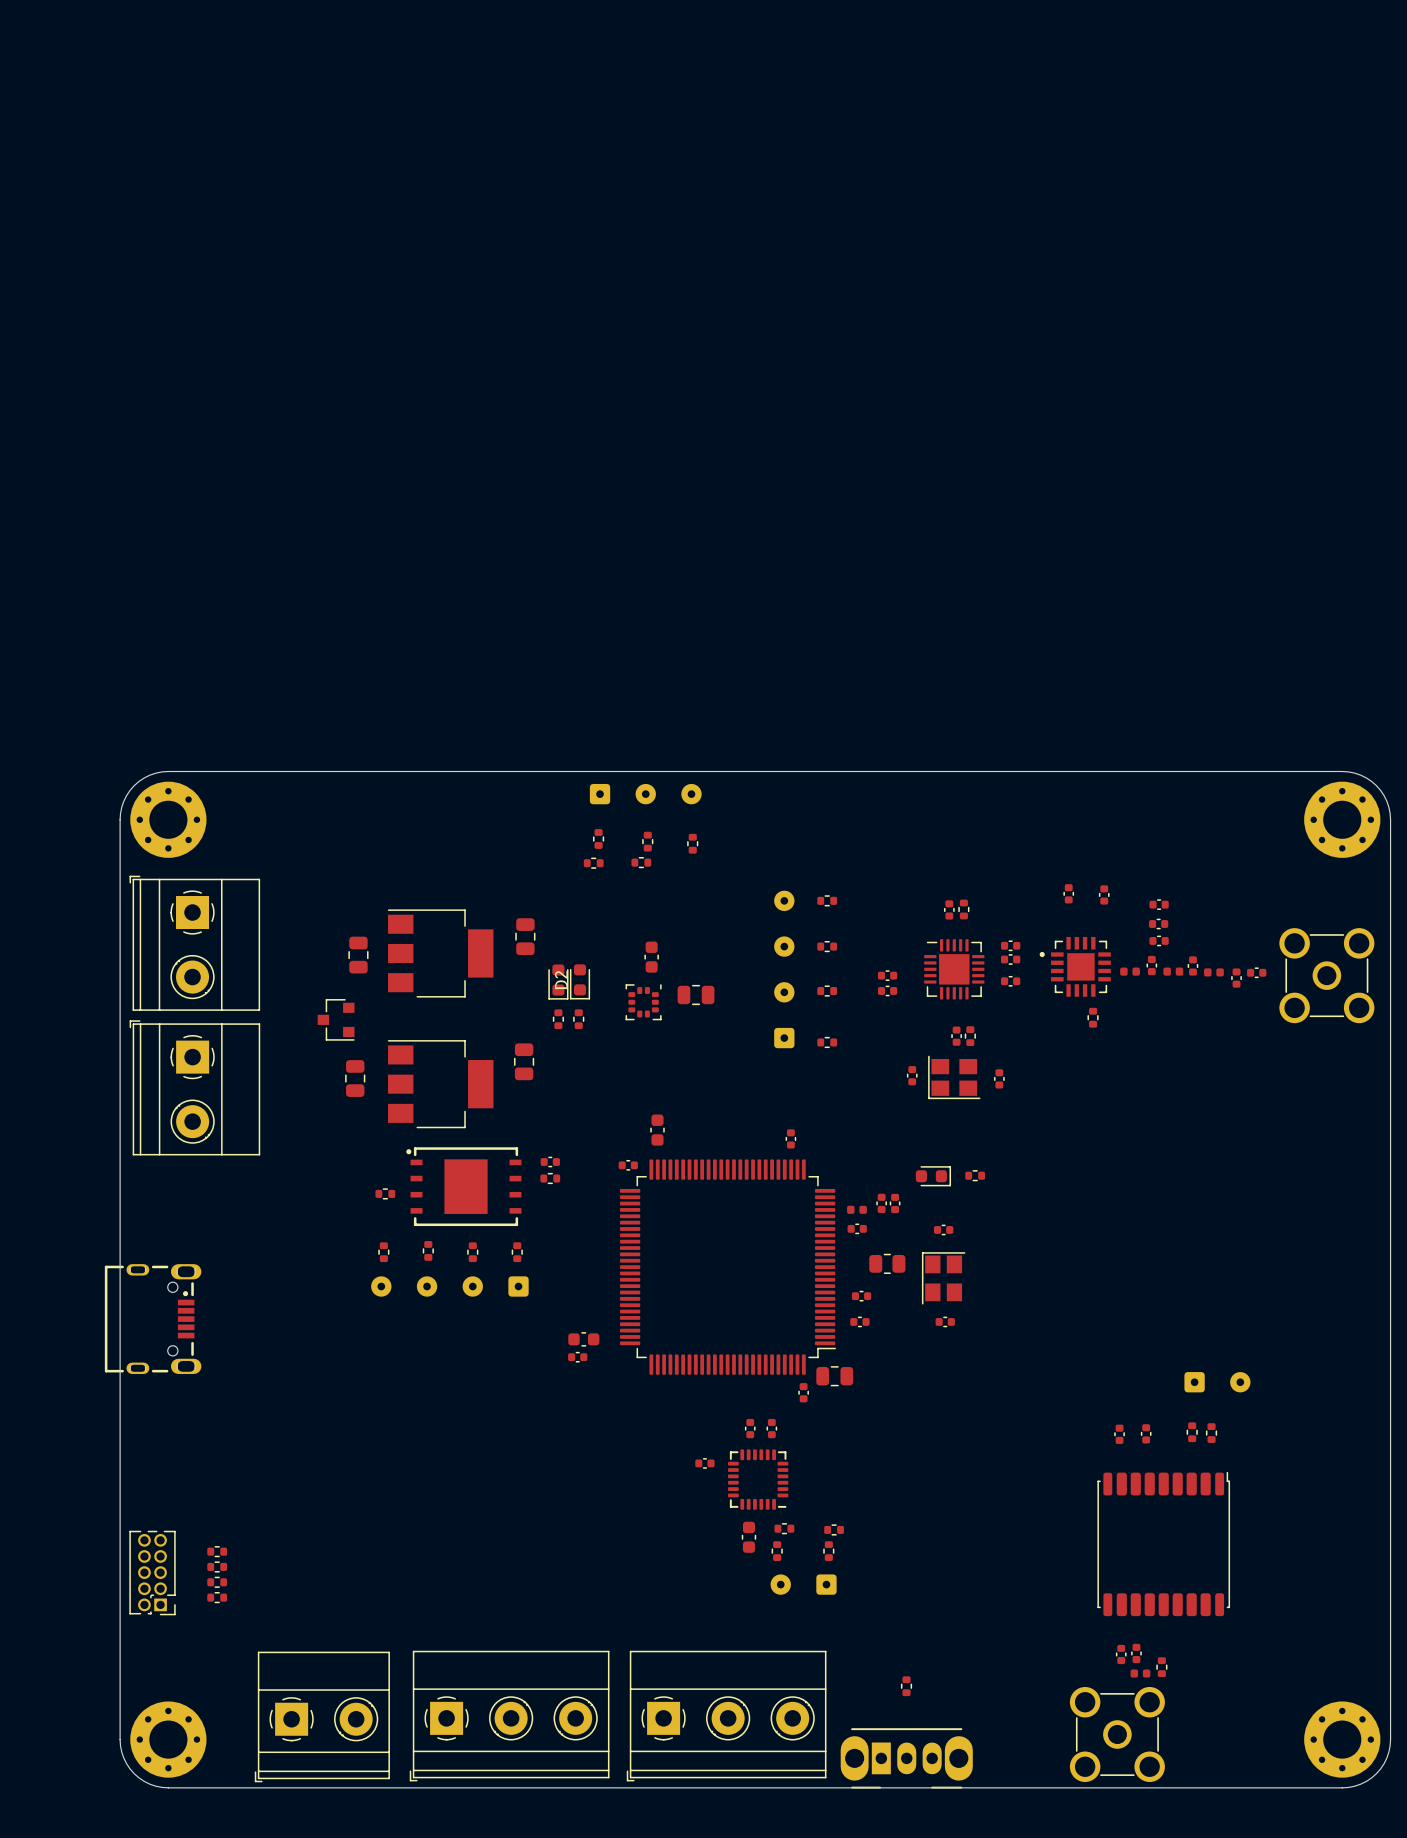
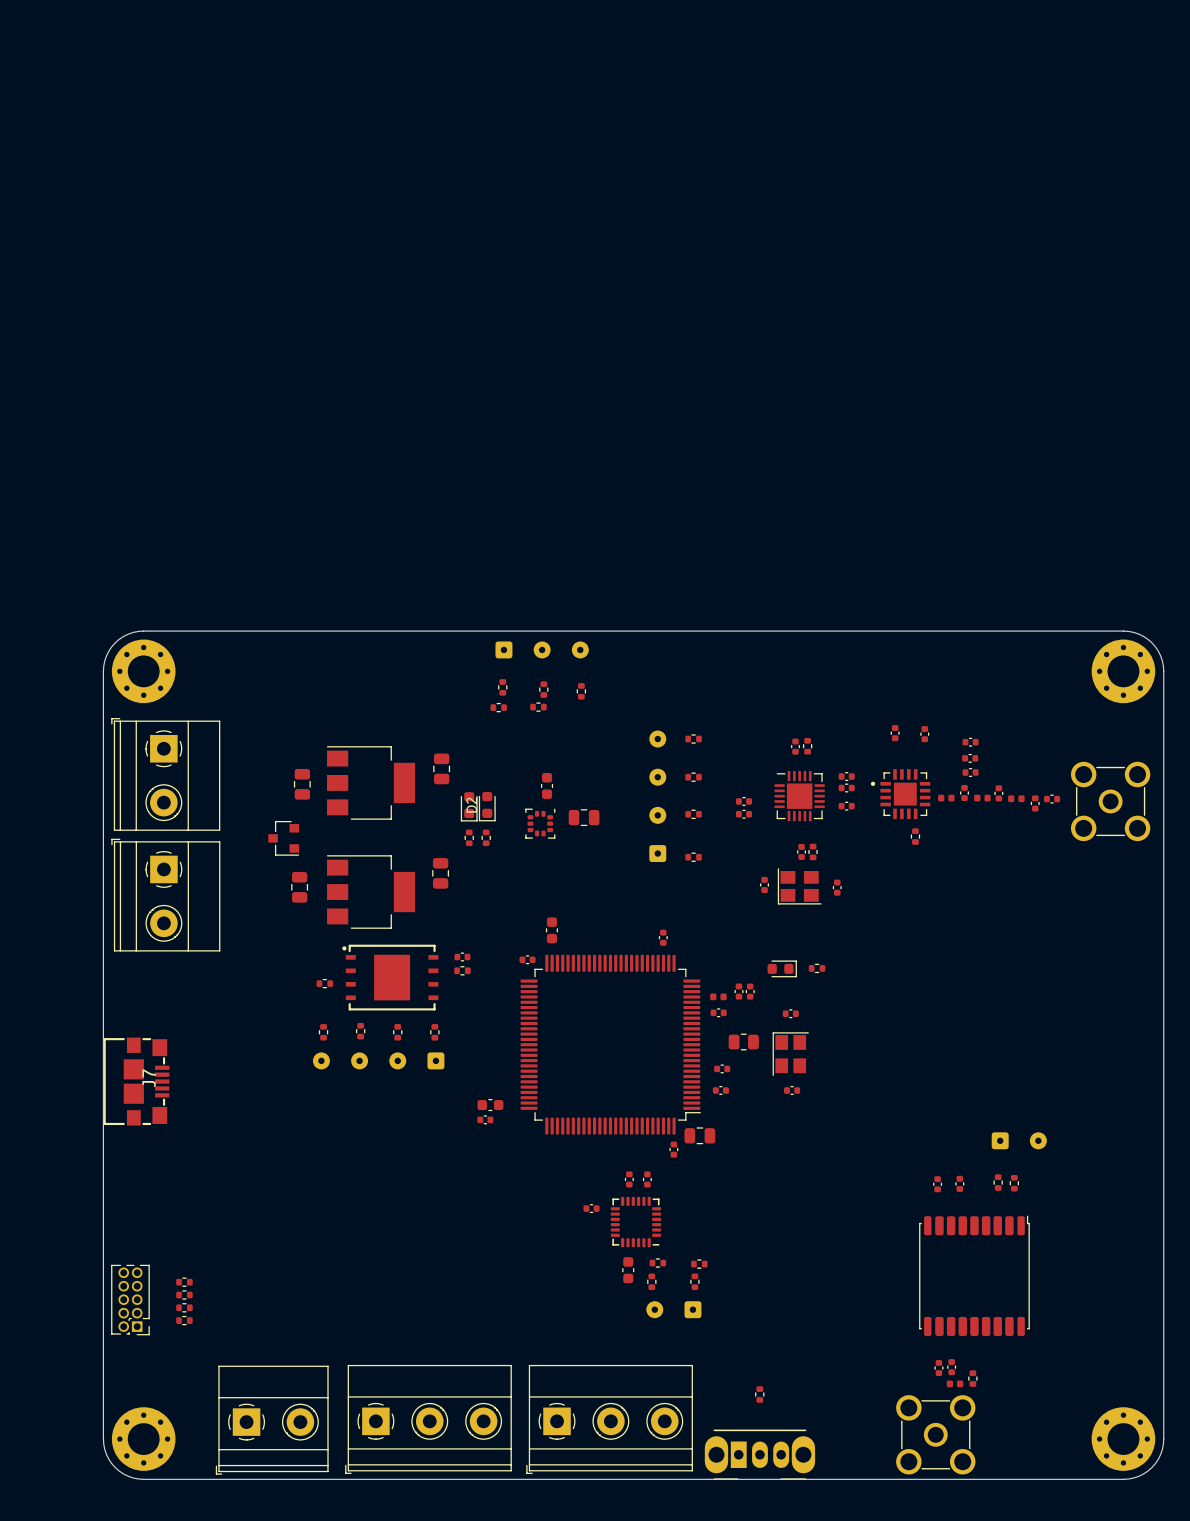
J7: none -> (136, 1081)
part: (153, 1319) -> none

